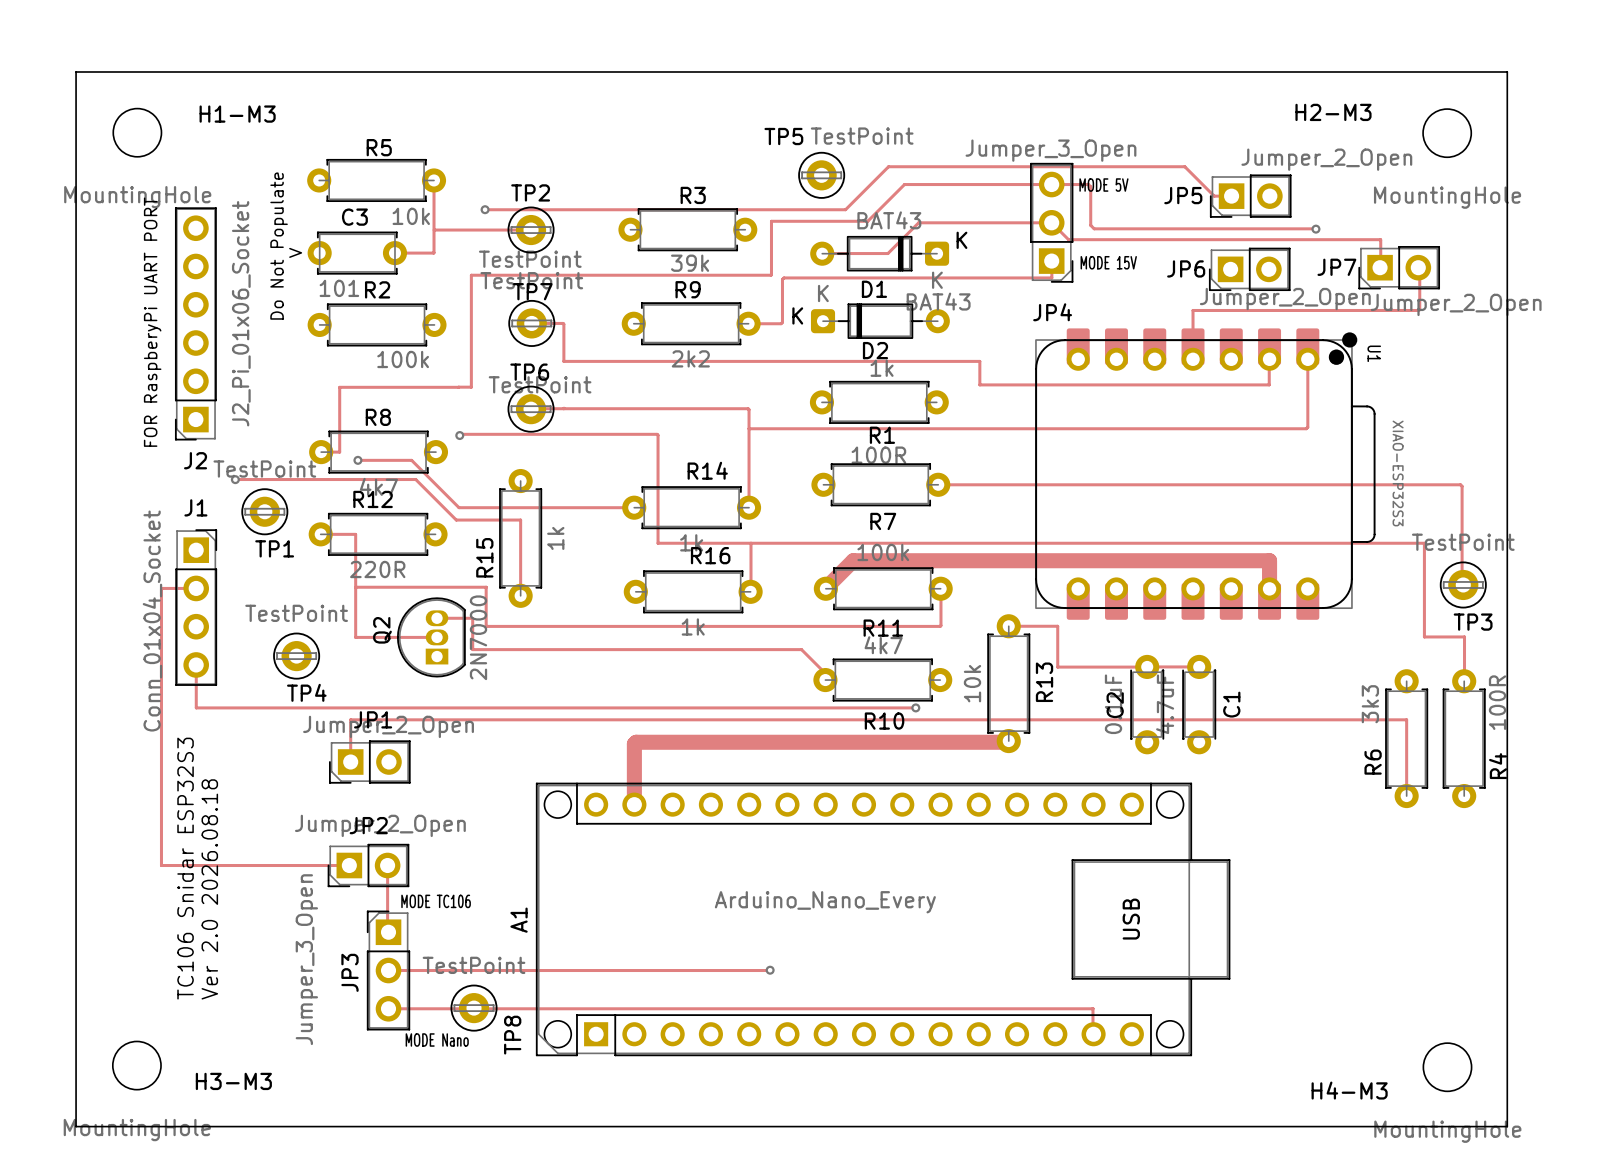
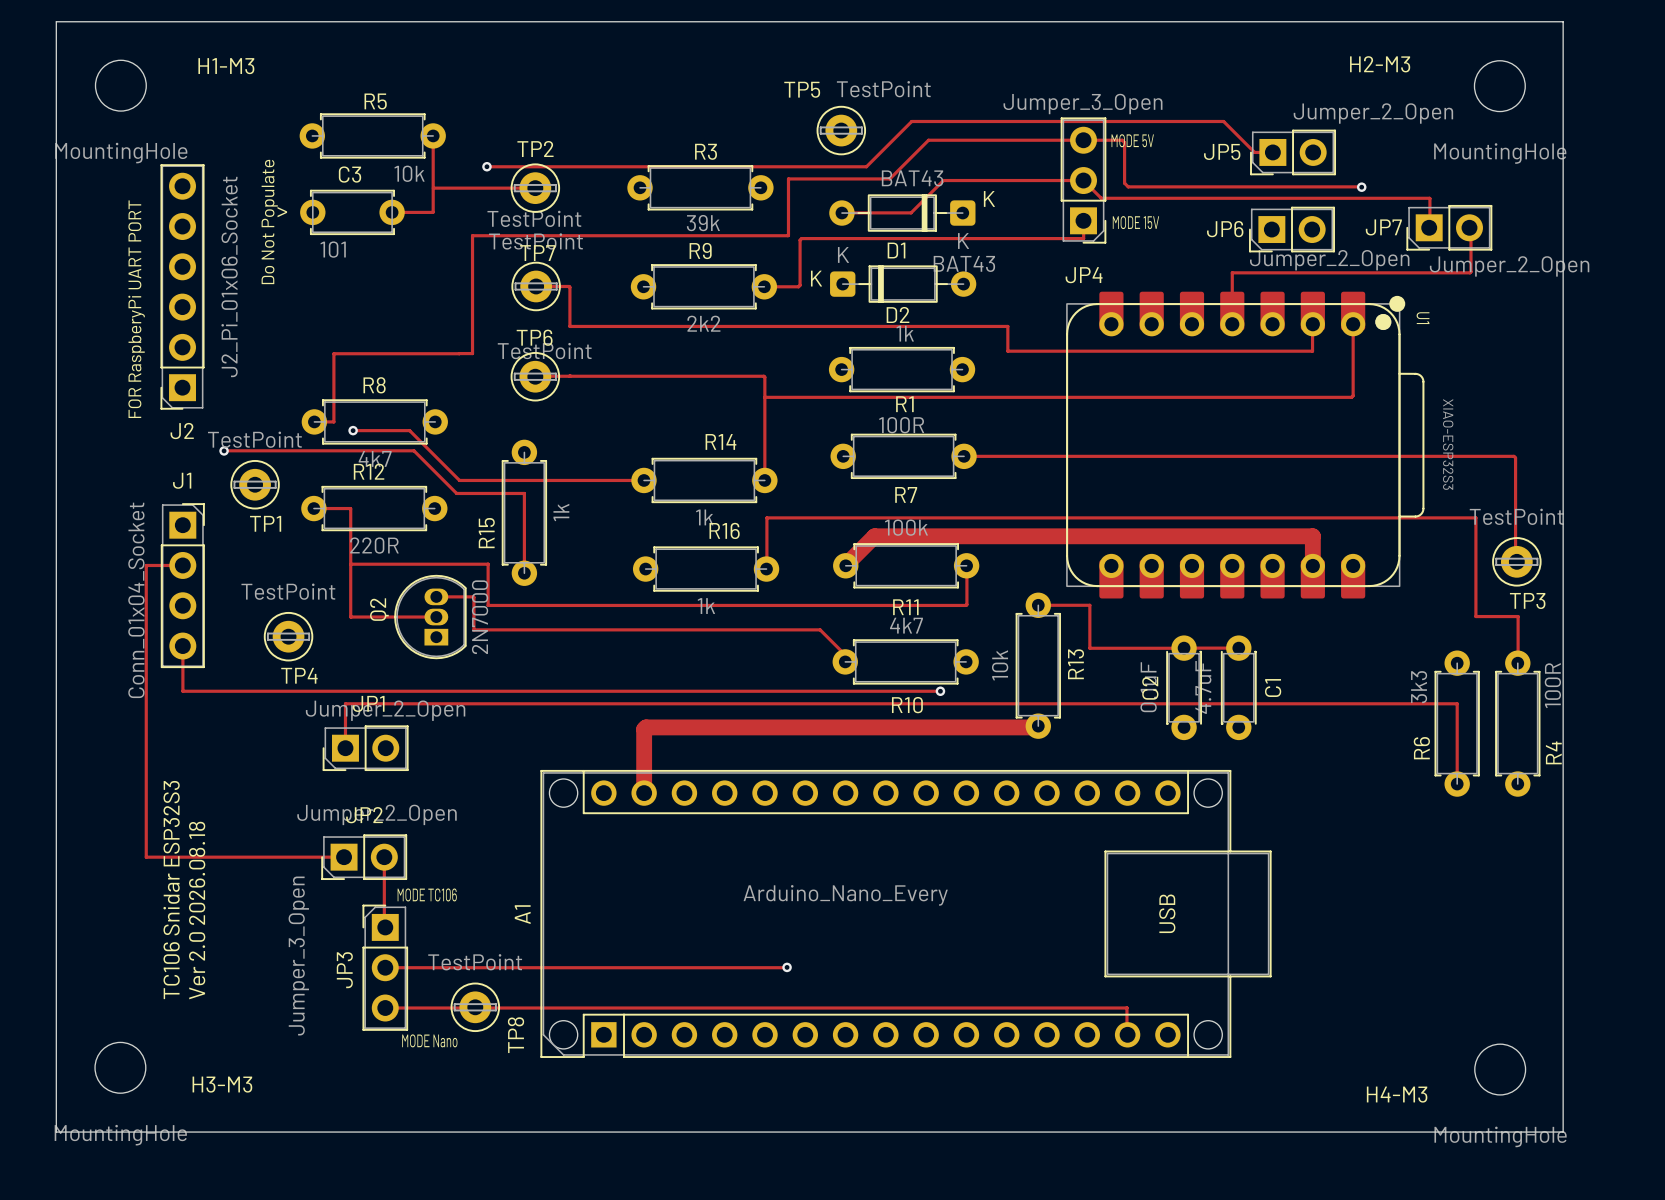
R2: 100k (377, 324) -> none
track: (459, 435) (657, 434) (658, 543) (750, 543) -> none
via: (459, 435) -> none

